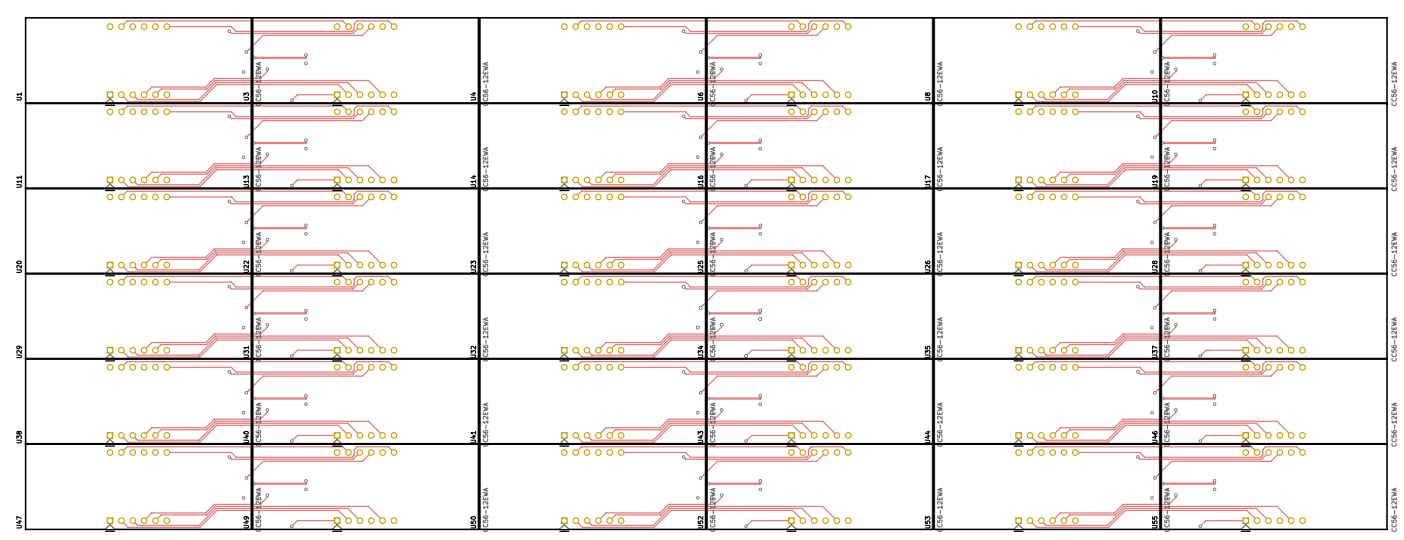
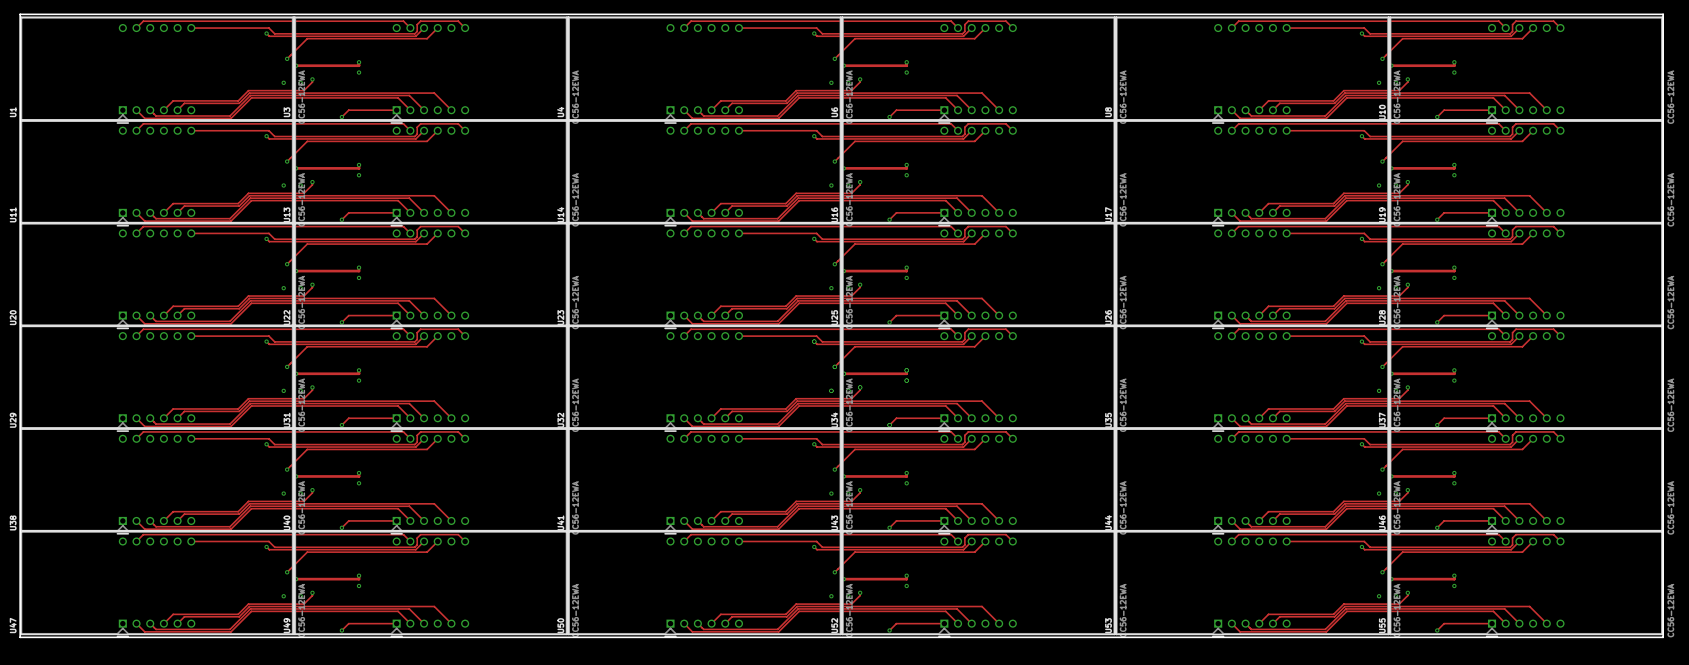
board edge: none -> (20, 14) (20, 637) (1663, 637) (1663, 14) (20, 14)

